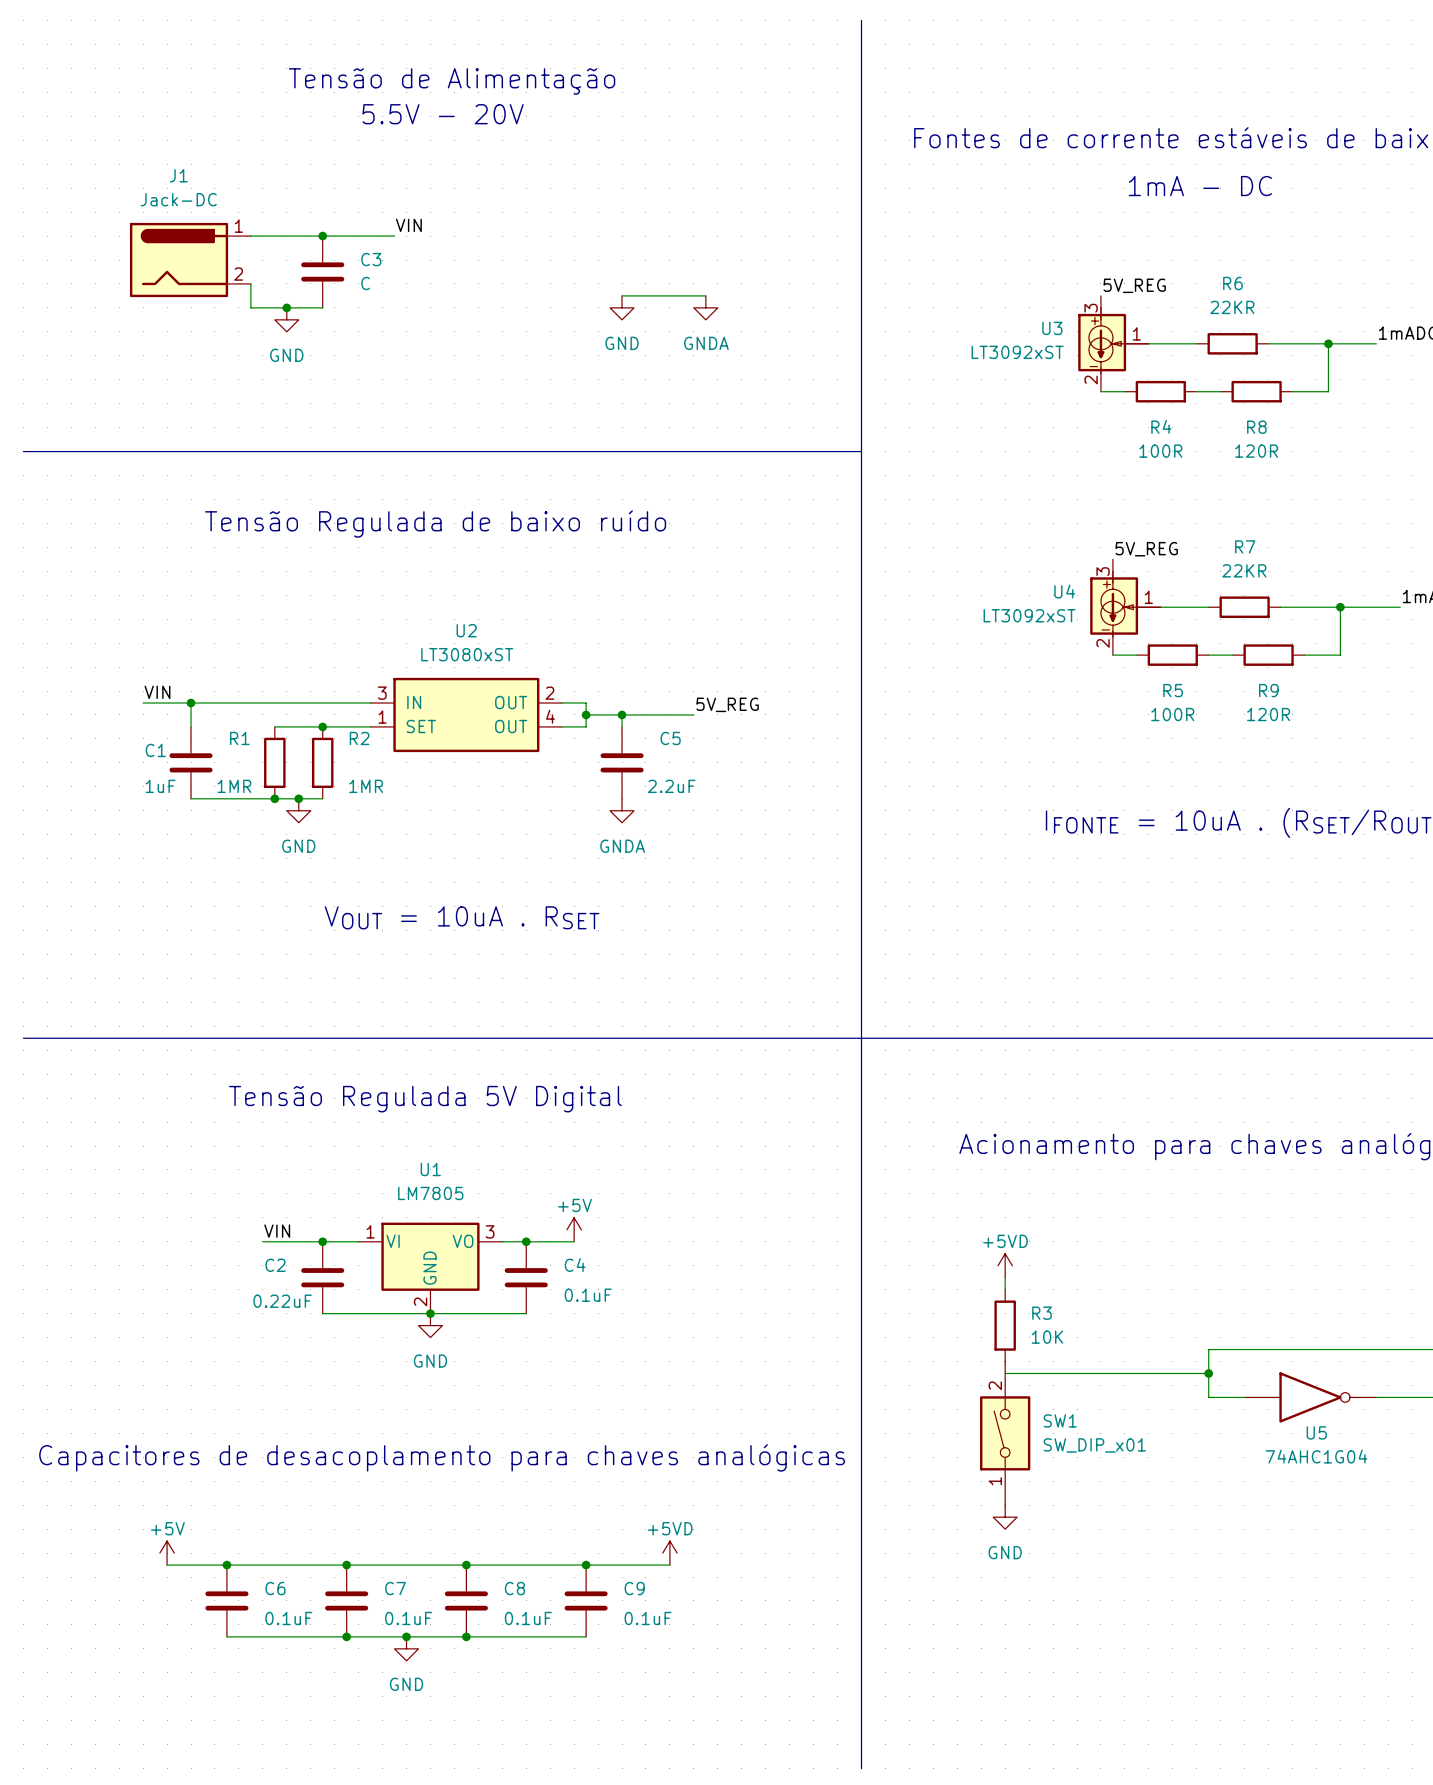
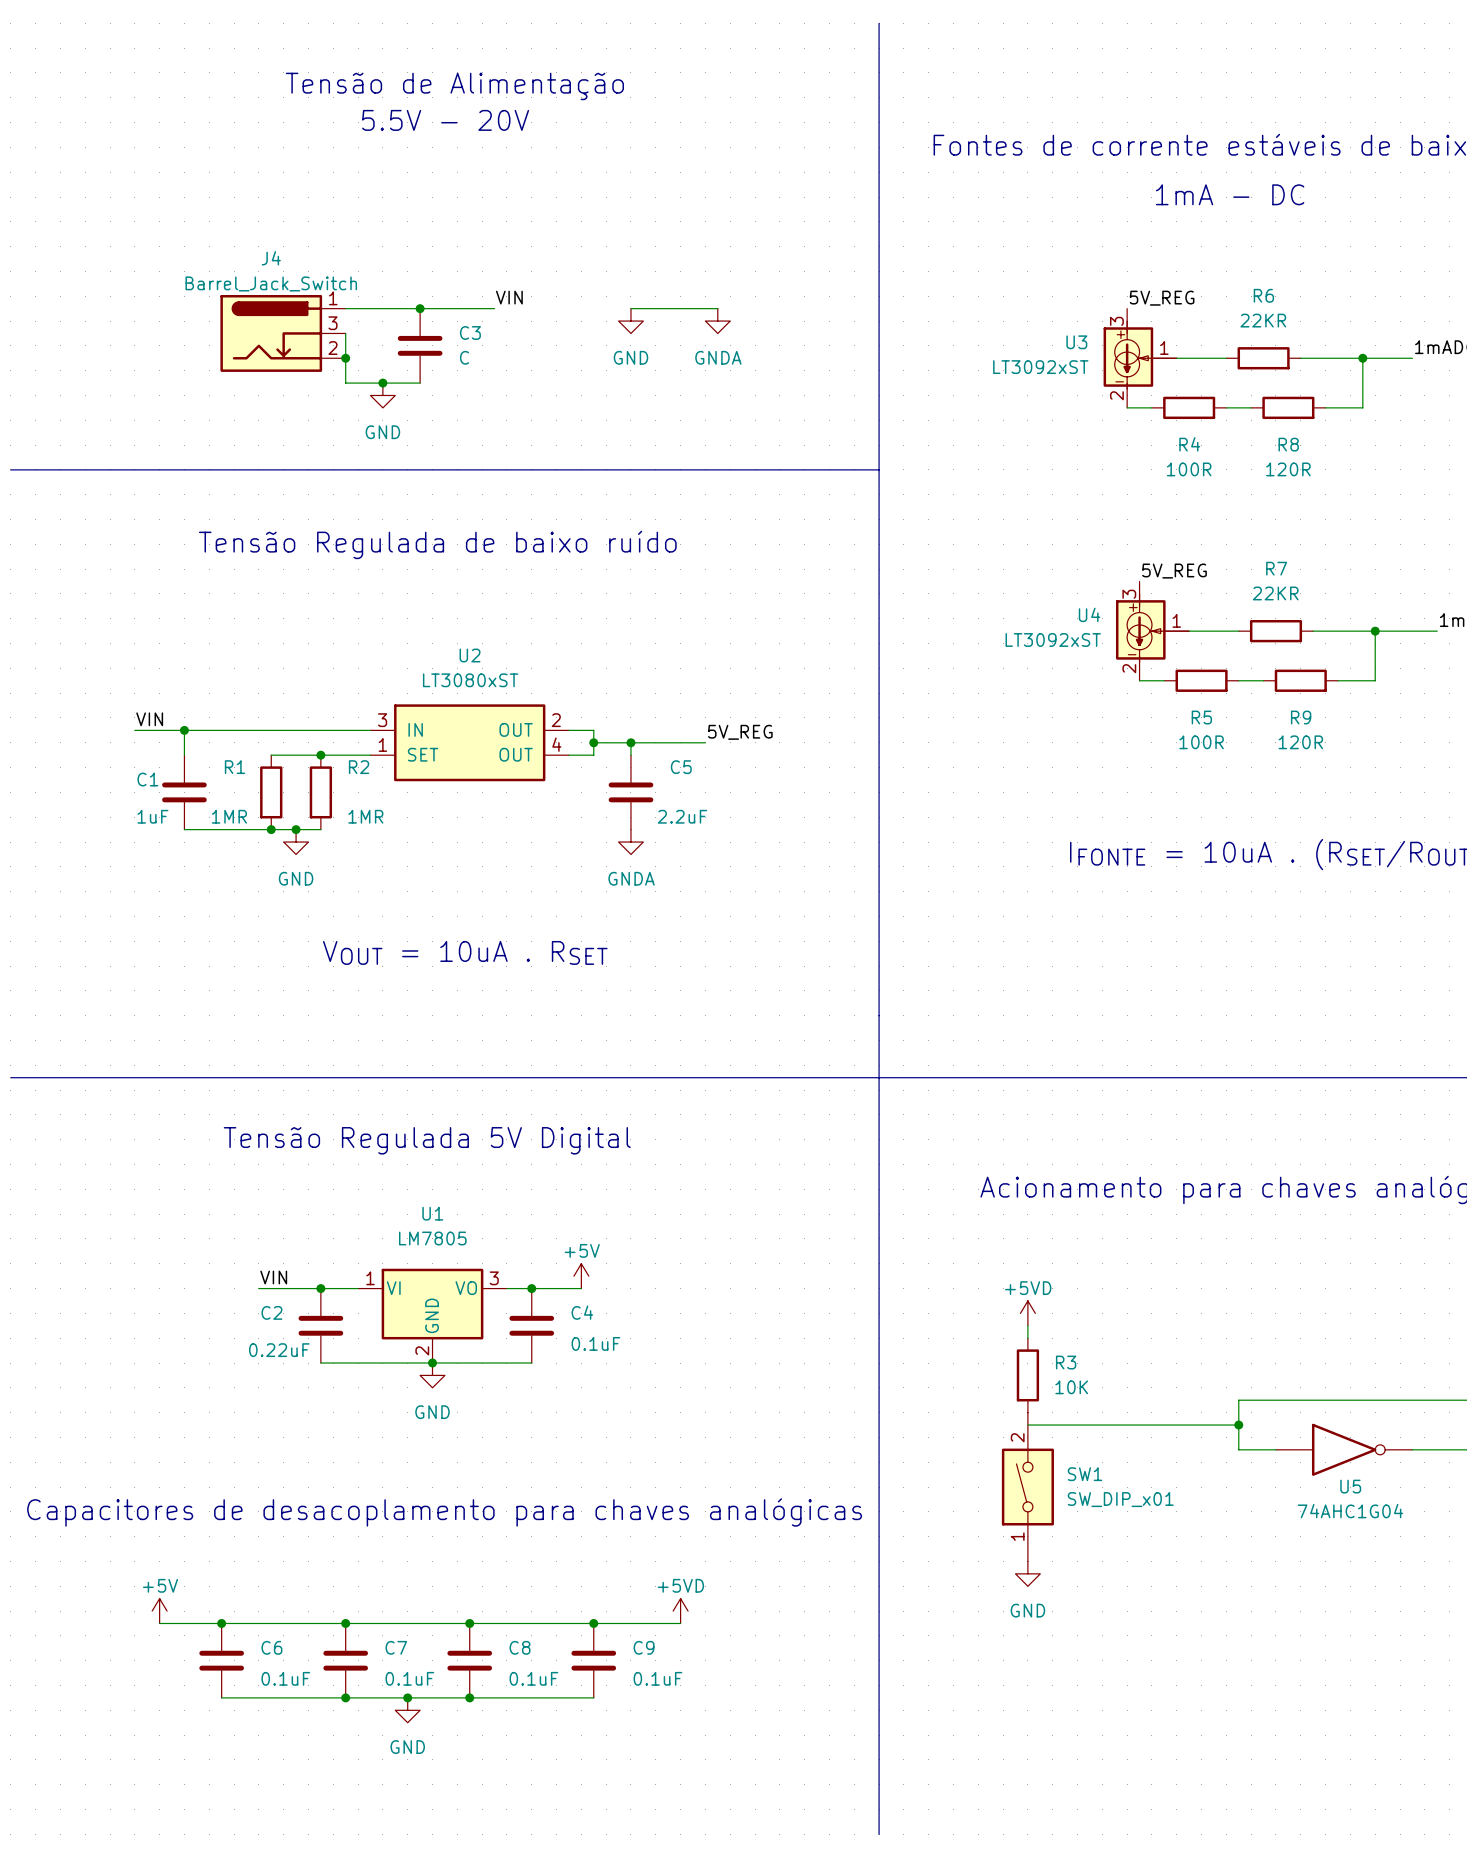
label position: VIN (408, 225) -> VIN (509, 297)
wire: (250, 236) (394, 236) -> (345, 308) (494, 308)
junction: (322, 236) -> none
J1: Jack-DC (190, 260) -> none
C3 position: (322, 271) -> (420, 345)
junction: none -> (420, 308)
junction: (286, 307) -> none
J4: none -> Barrel_Jack_Switch (283, 333)
power symbol position: GND (286, 319) -> GND (382, 395)
wire: none -> (345, 333) (345, 383) (420, 383)
junction: none -> (345, 358)
junction: none -> (382, 383)

